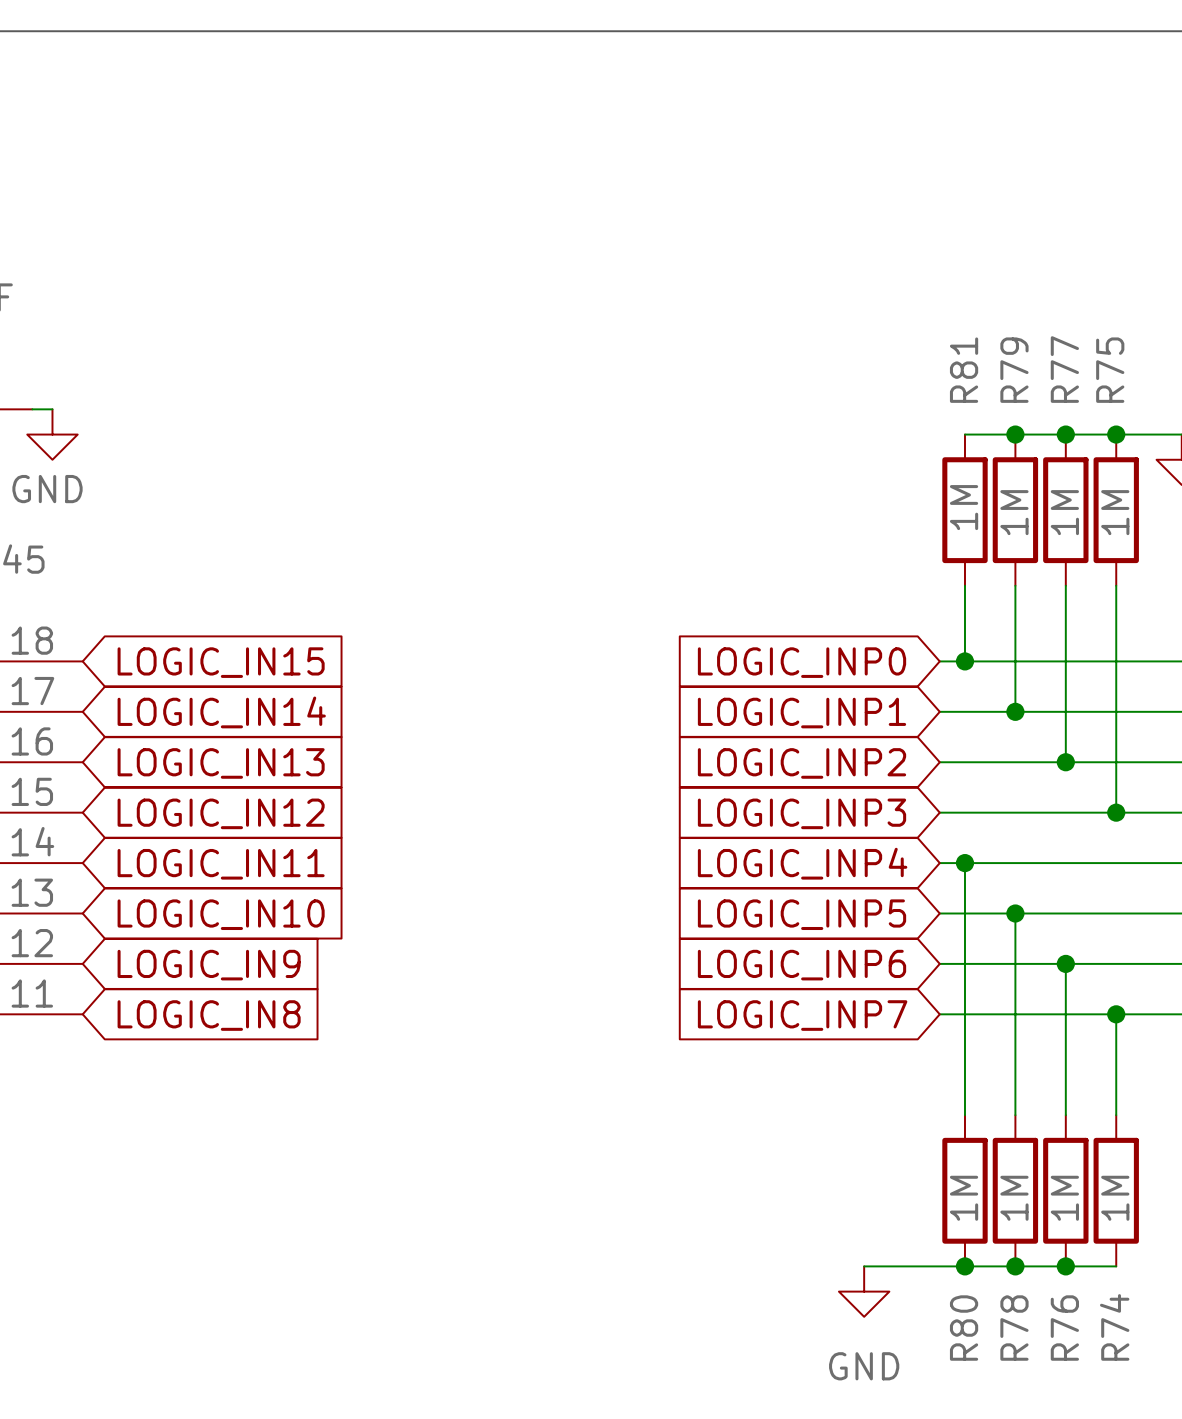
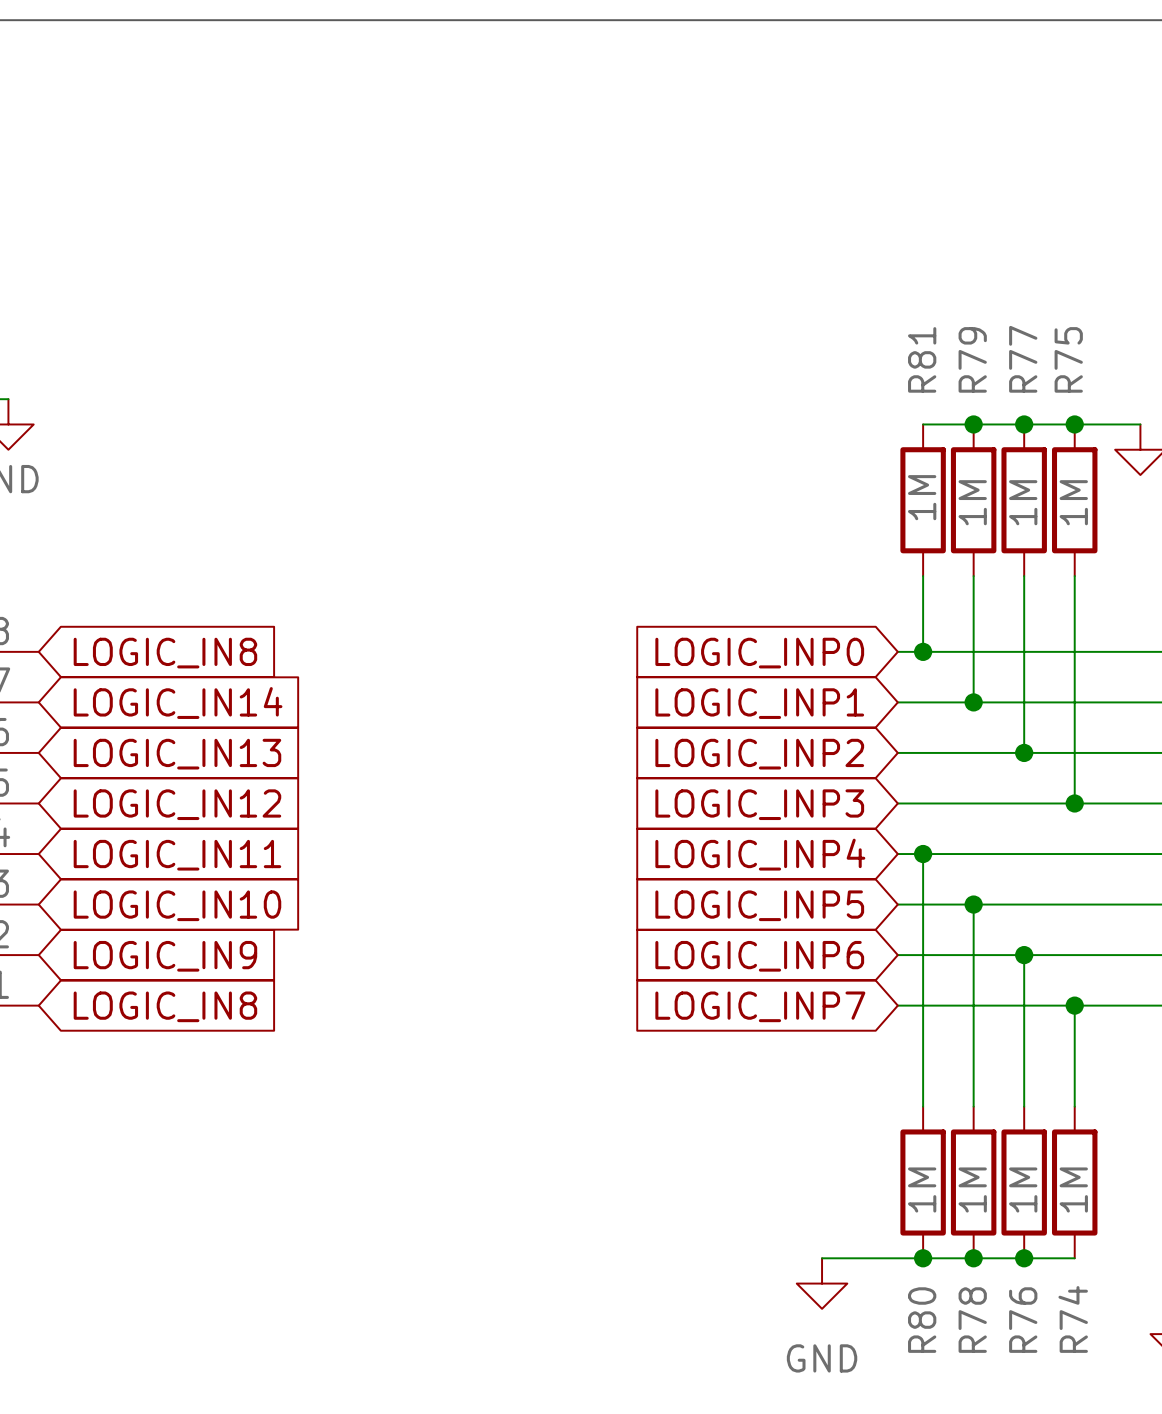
global label: LOGIC_IN15 (221, 662) -> LOGIC_IN8 (165, 653)

